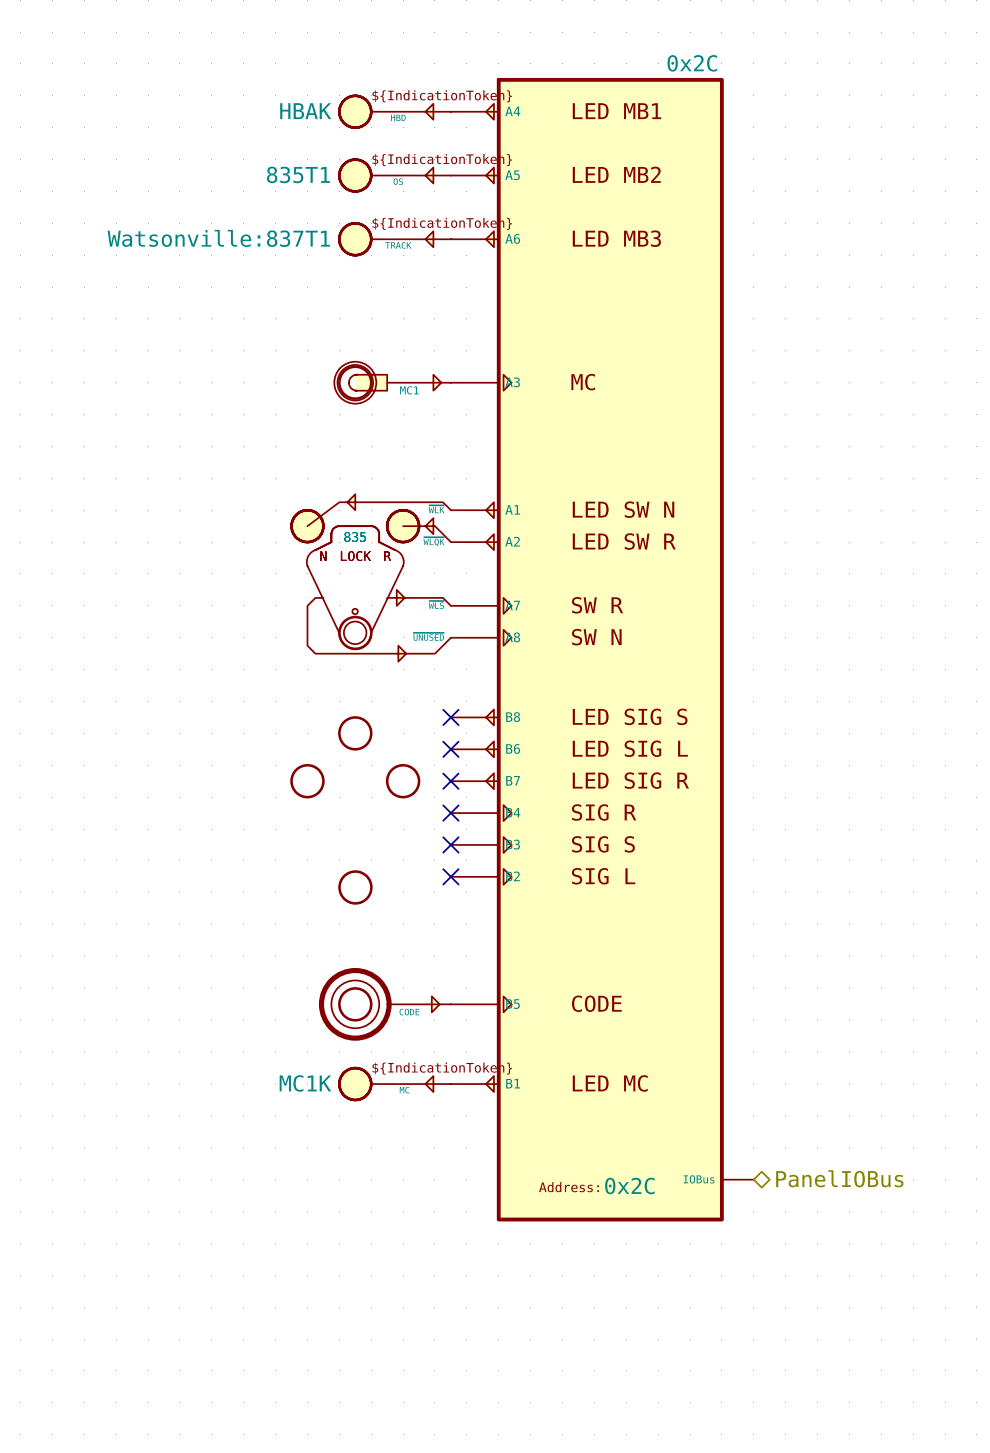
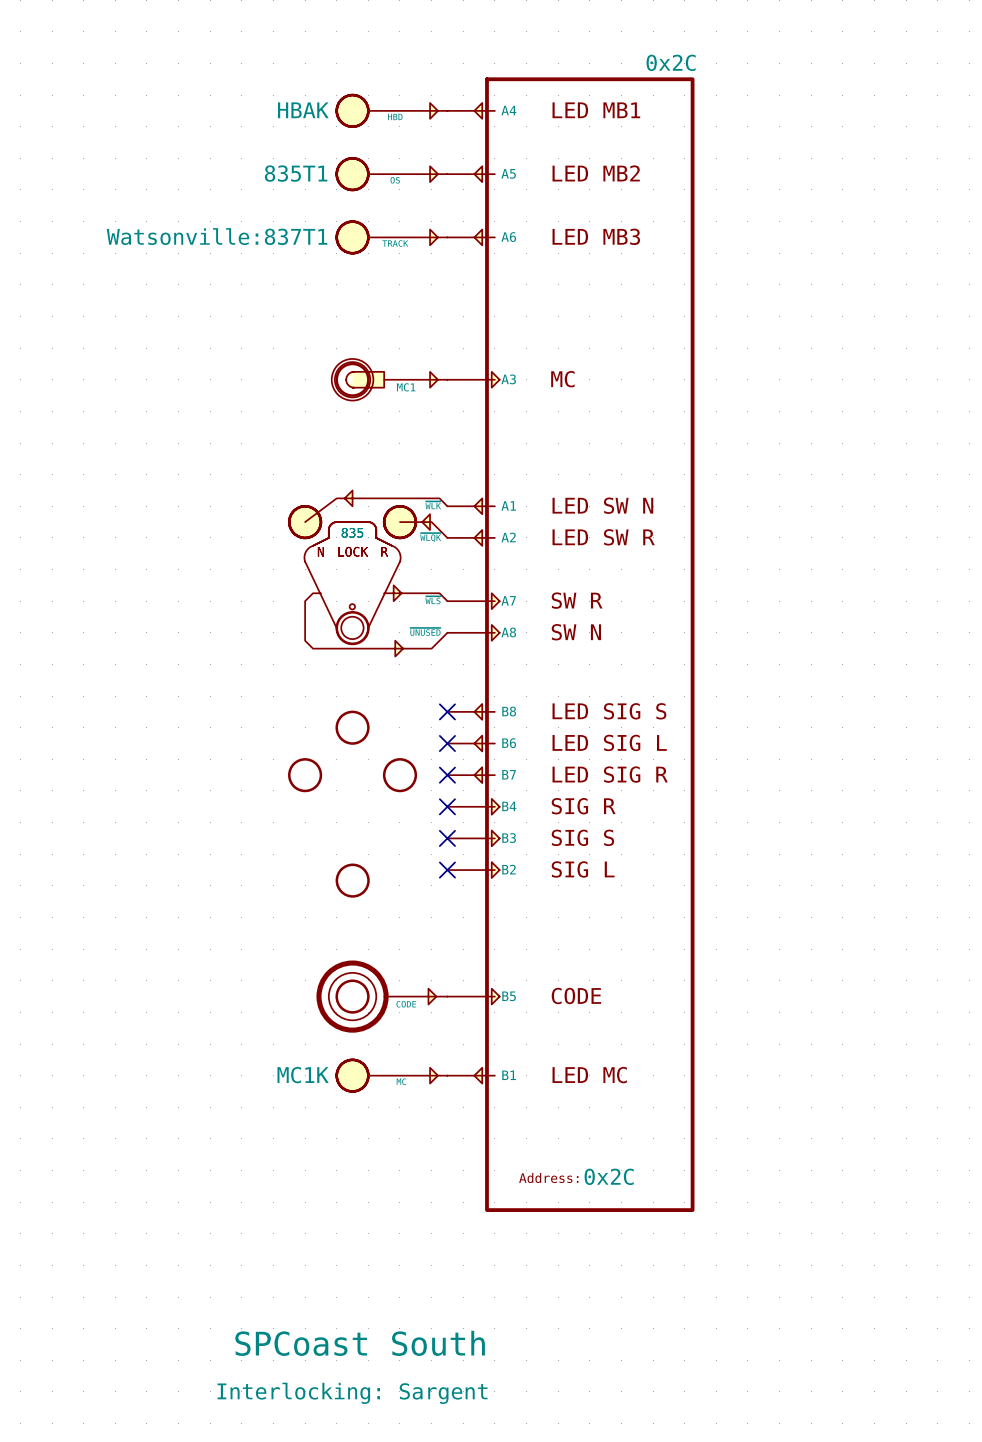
part symbol: [338, 94, 451, 129] -> [335, 93, 448, 128]
part symbol: [338, 158, 451, 193] -> [335, 157, 448, 192]
part symbol: [338, 222, 451, 257] -> [335, 220, 448, 255]
part: none -> 0x2C (570, 644)
part: 0x2C (602, 649) -> none
part symbol: [338, 1066, 451, 1102] -> [335, 1058, 448, 1093]
hierarchical label: PanelIOBus (839, 1178) -> none
part text: none -> SPCoast South (360, 1343)
part text: none -> Interlocking: Sargent (352, 1393)

